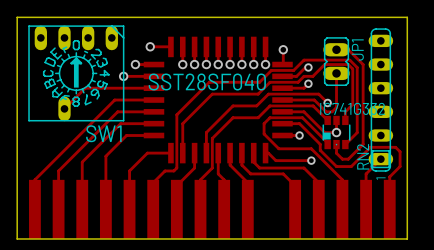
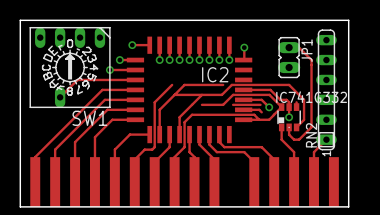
track: (308, 67) (305, 67) (296, 76) (282, 76) -> none
via: (308, 67) -> none
track: (336, 73) (336, 107) (332, 111) -> (289, 107) (289, 102) (285, 99)
SST28SF040 name: SST28SF040 (207, 81) -> IC2 (215, 74)
track: (308, 83) (303, 88) (282, 88) -> none
via: (308, 83) -> none
track: (197, 94) (209, 82) (259, 82) (271, 70) (293, 70) (303, 60) (349, 60) (357, 67) (357, 132) (354, 135) -> none
track: (258, 94) (269, 82) (298, 82) (303, 76) (312, 76) (324, 64) (348, 64) (352, 68) (352, 104) (345, 111) (345, 114) -> none
track: (318, 94) (327, 102) -> (274, 84) (289, 84) (304, 99) (304, 119)
via: (327, 102) -> none
track: none -> (174, 94) (202, 94)
track: (233, 117) (221, 129) -> (281, 107) (269, 119) (259, 119) (254, 114) (192, 114)
track: (269, 117) (264, 123) (264, 134) (278, 148) (311, 148) (342, 179) -> (281, 127) (281, 139) (294, 152) (294, 157)
track: (302, 117) (327, 144) -> none
track: (312, 120) (324, 132) (336, 132) -> none
via: none -> (269, 107)
track: (299, 123) (320, 144) (320, 150) (336, 166) (351, 166) (370, 147) (395, 147) (400, 151) (400, 166) (389, 176) (389, 209) -> (258, 109) (261, 112)
via: (299, 135) -> none
track: (265, 153) (268, 153) (275, 160) (311, 160) -> none
via: (311, 160) -> none

